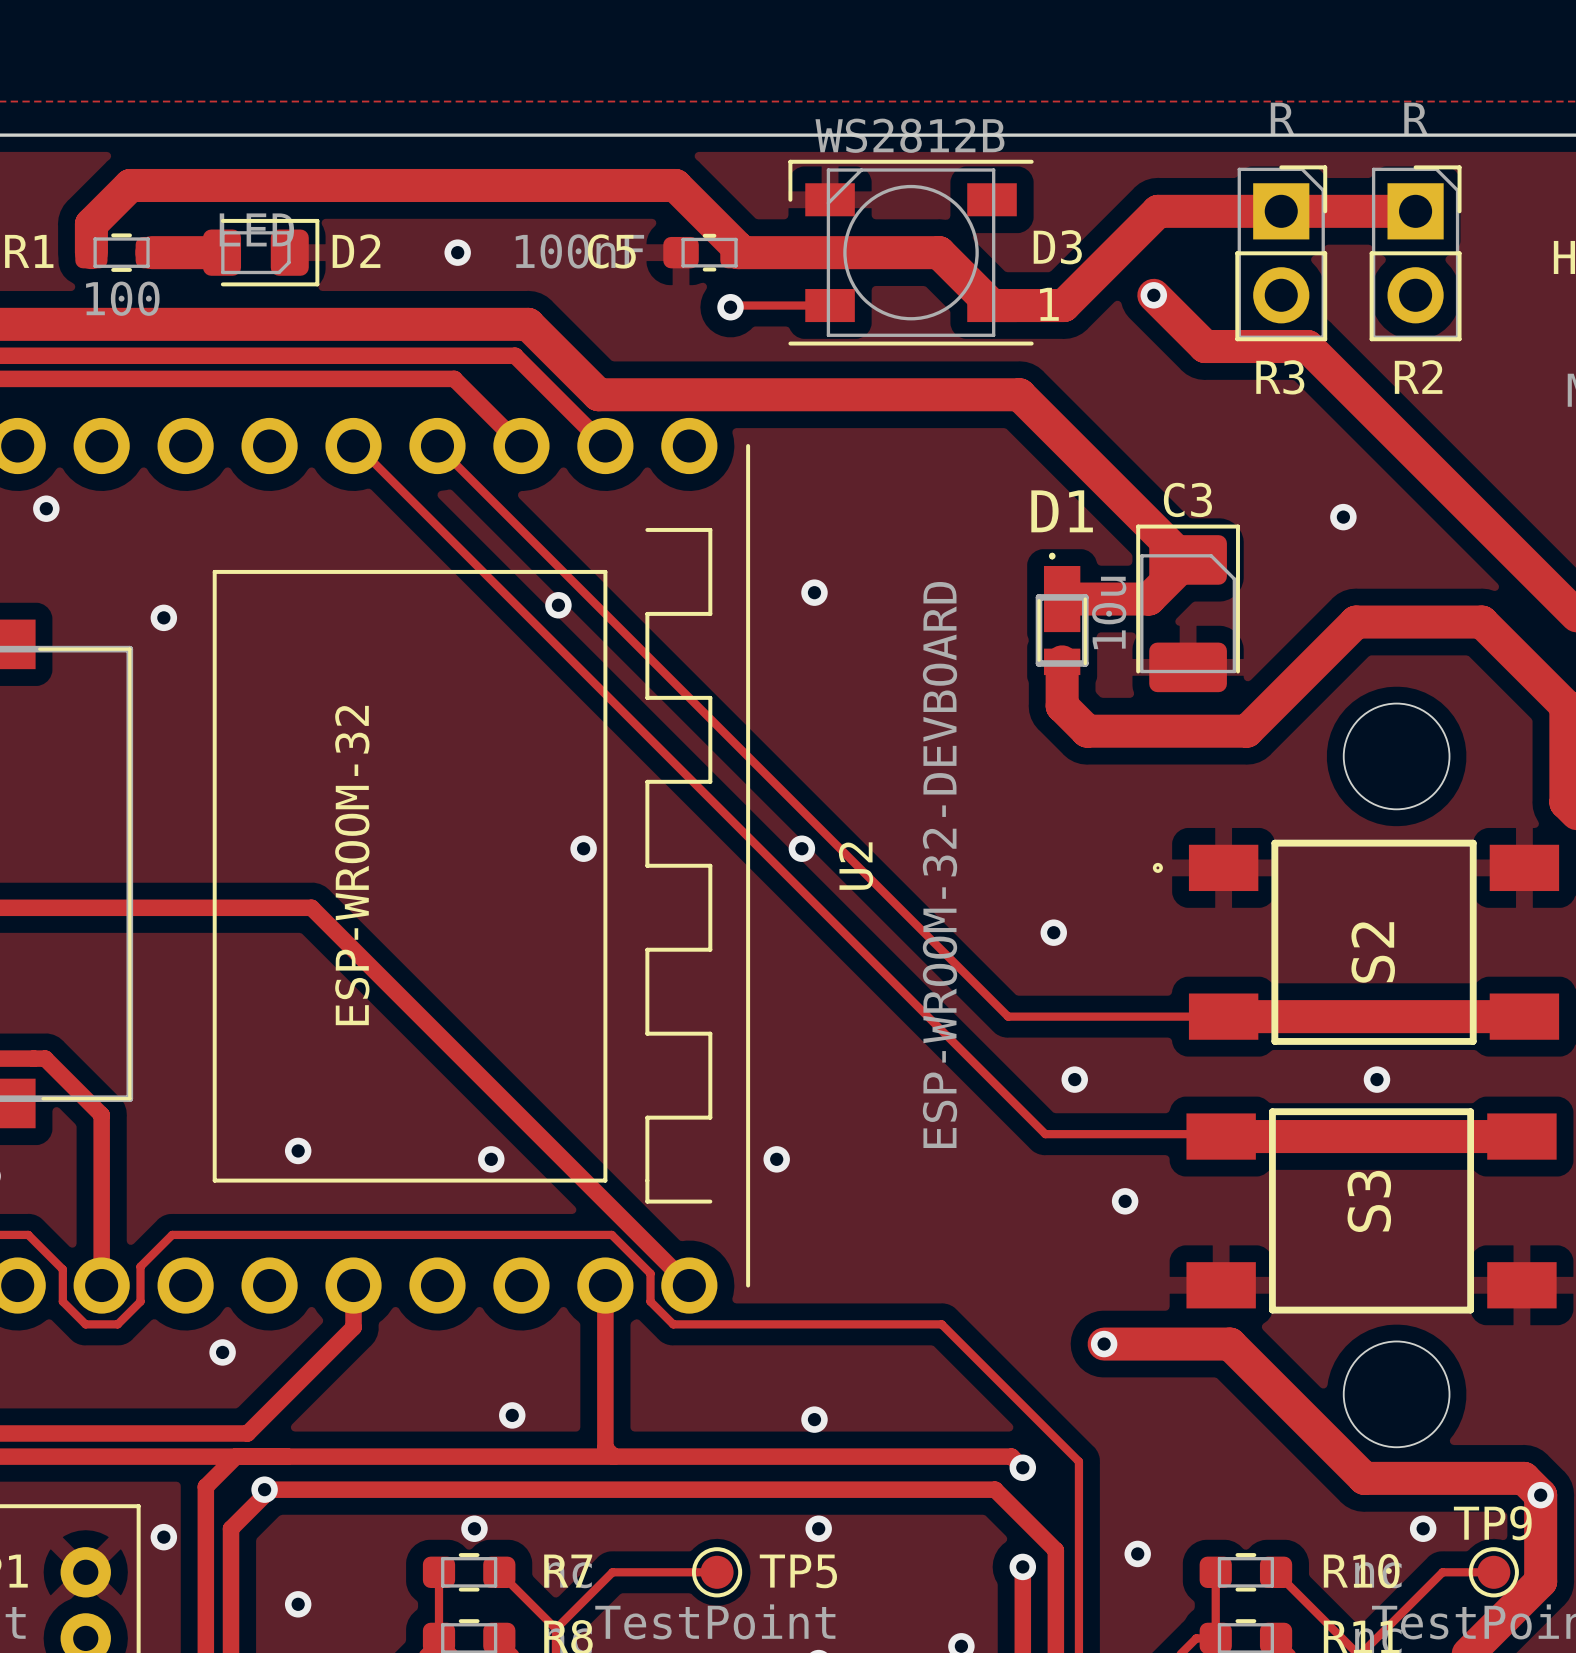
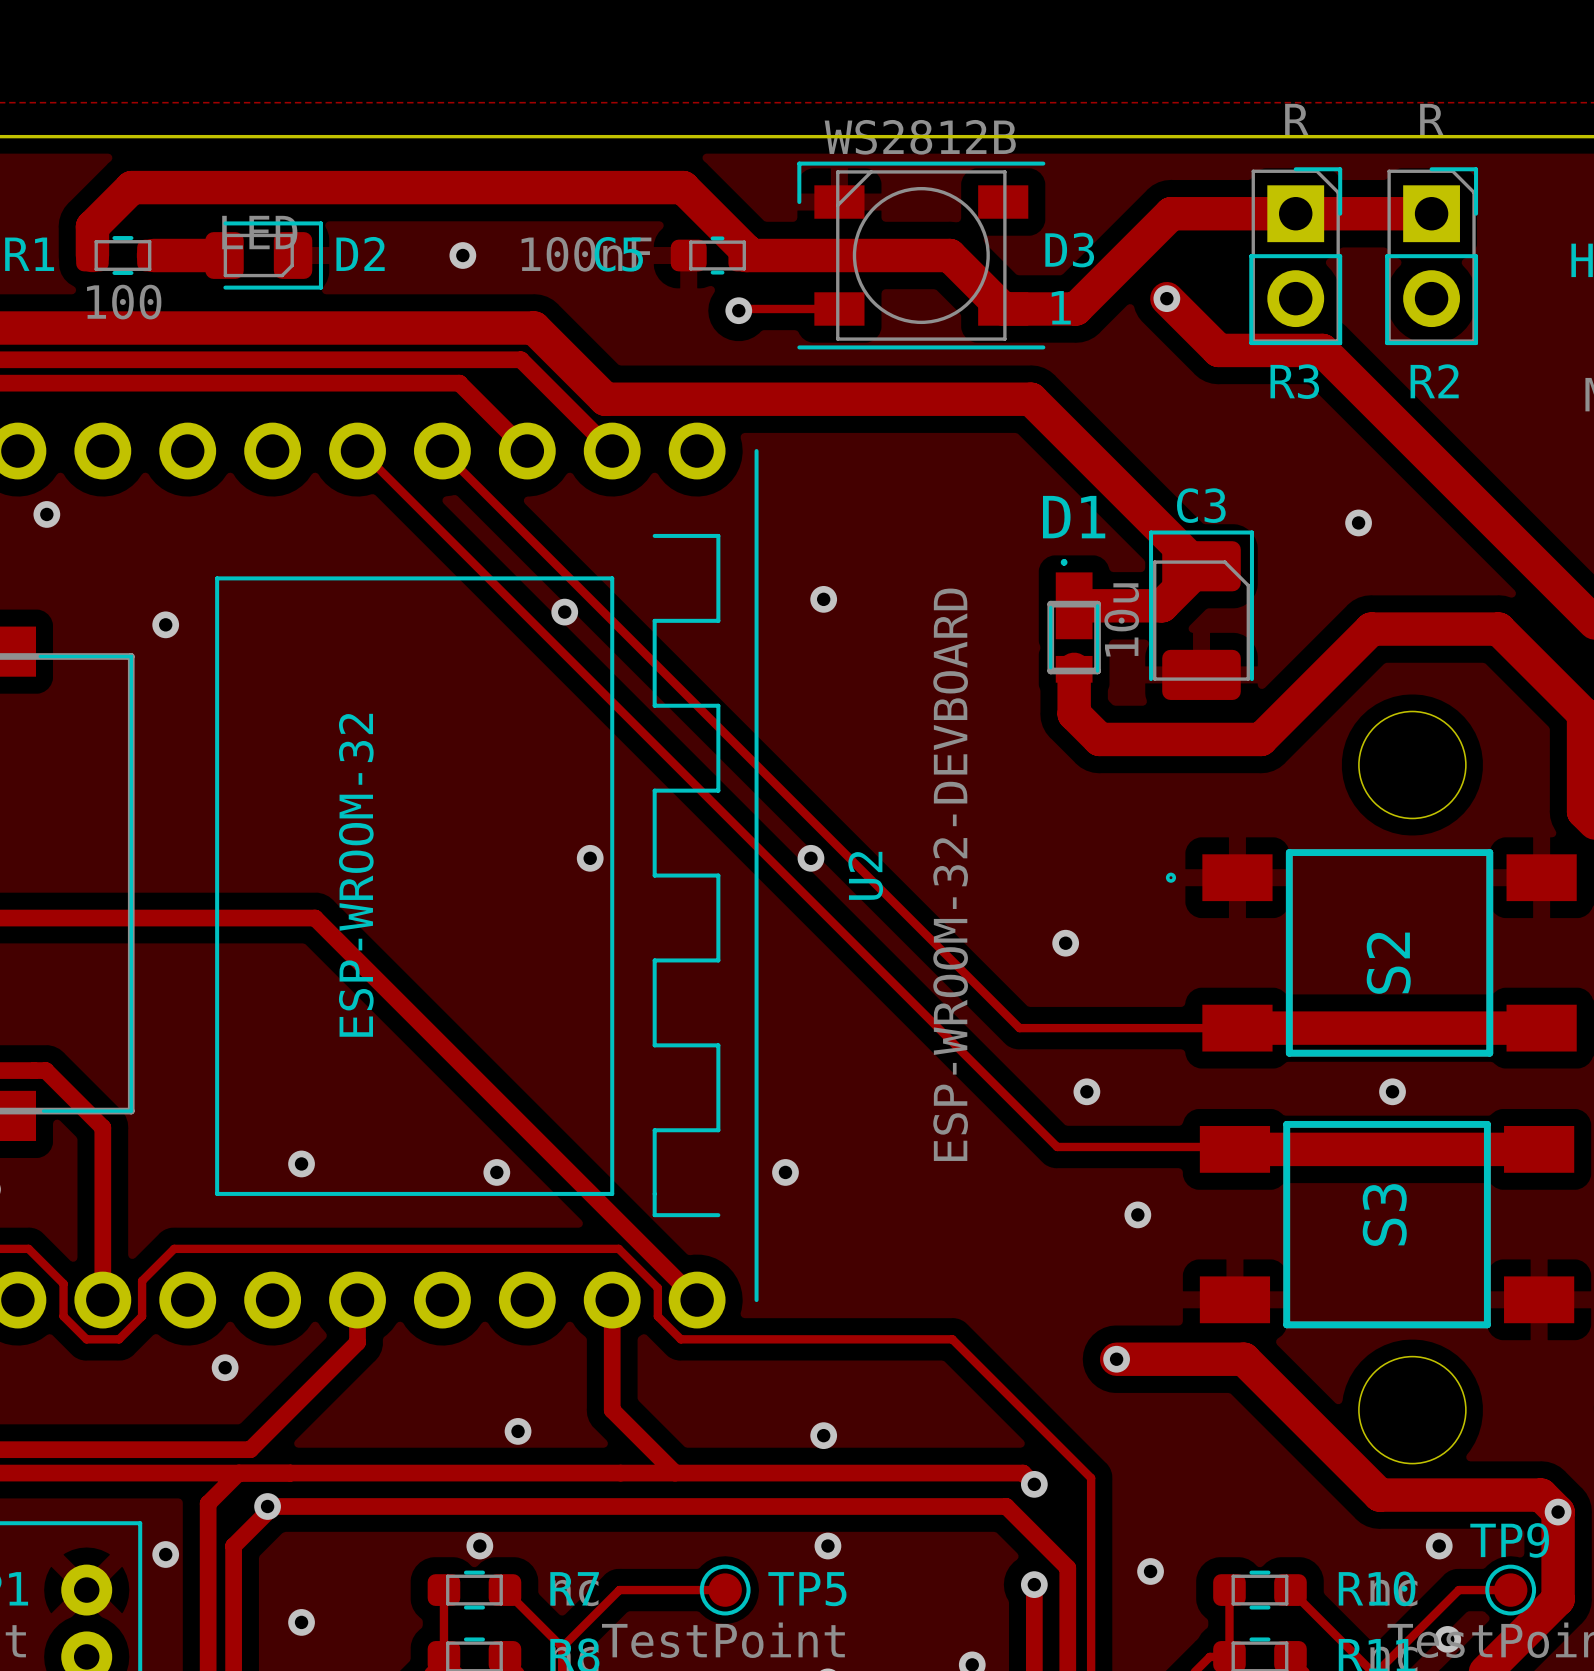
track: (605, 1394) (605, 1448) (613, 1456) -> (612, 1410) (675, 1473)
via: none -> (1447, 1639)

